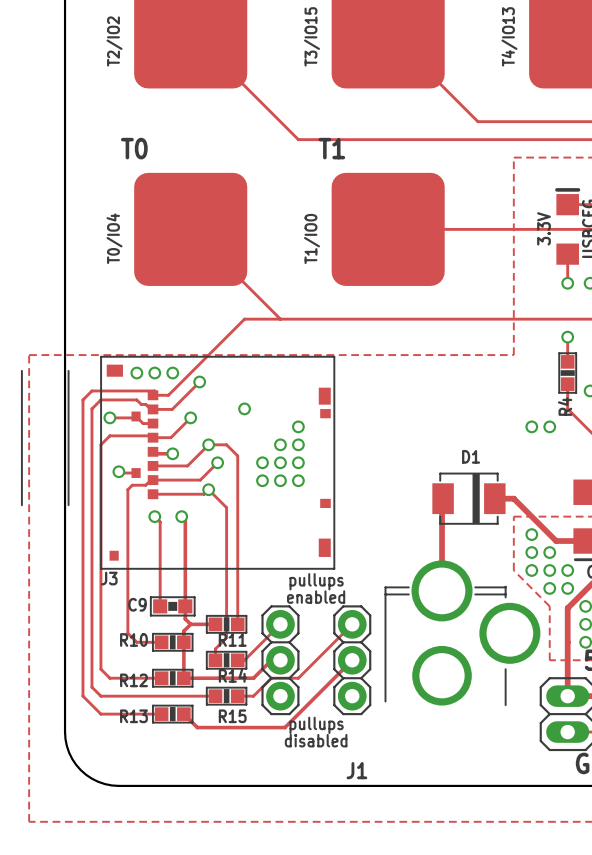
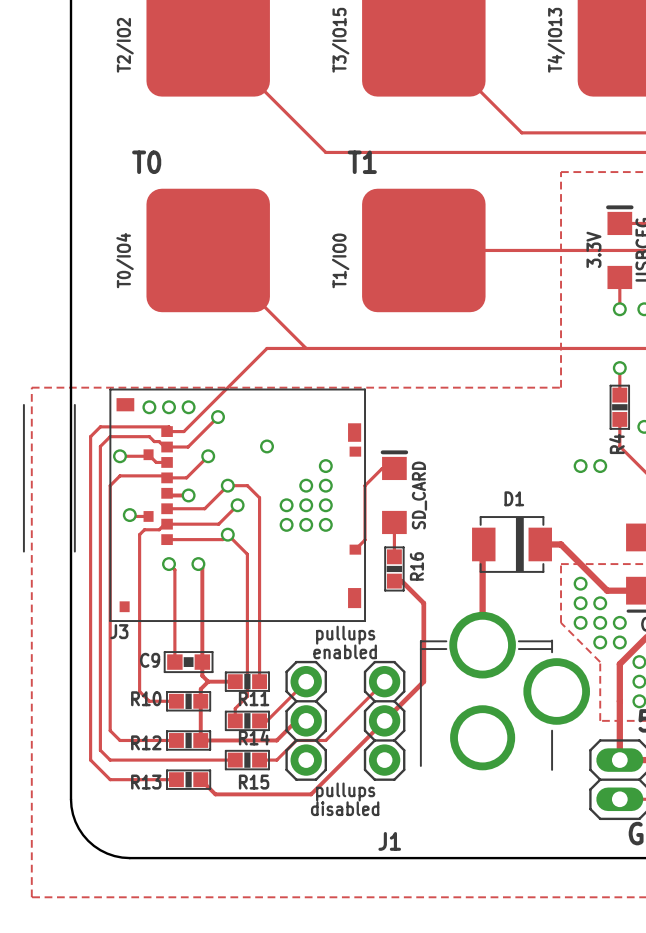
track: none -> (394, 468) (382, 468) (365, 485) (365, 539) (355, 549)
part: none -> (394, 492)
text: none -> SD_CARD (419, 495)
track: none -> (394, 522) (394, 556)
R16: none -> (394, 568)
track: none -> (394, 581) (401, 581) (423, 603) (423, 681) (384, 720)

